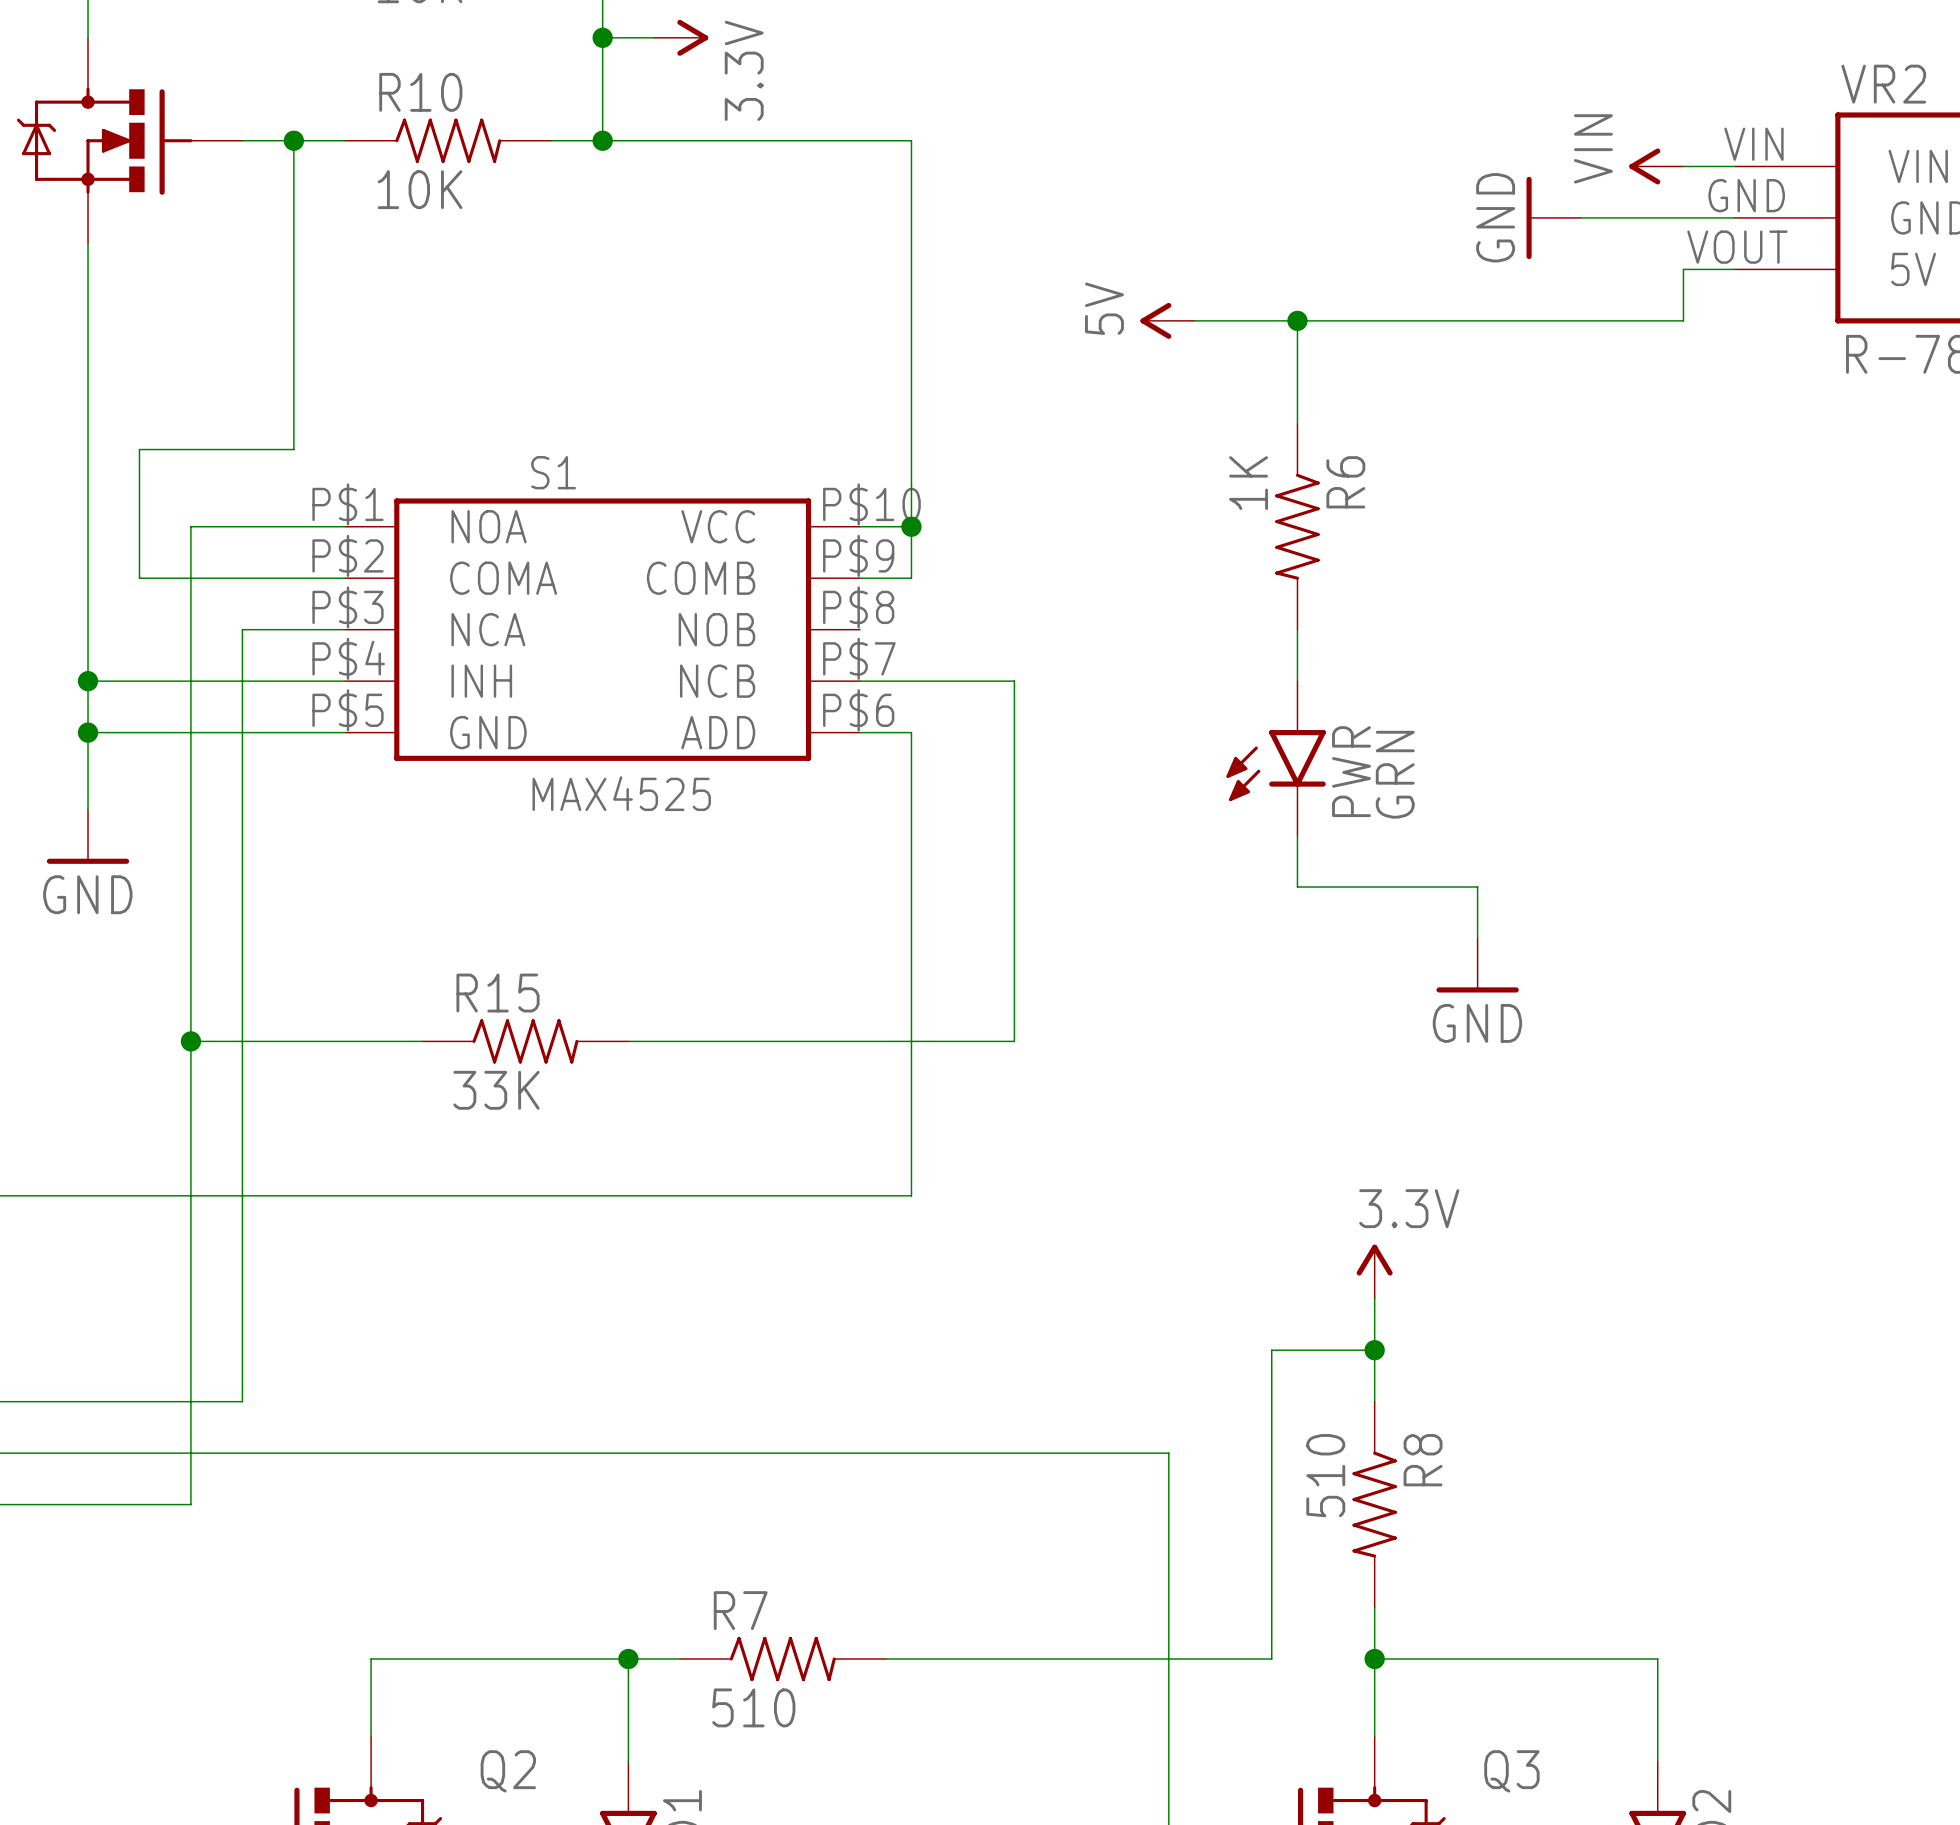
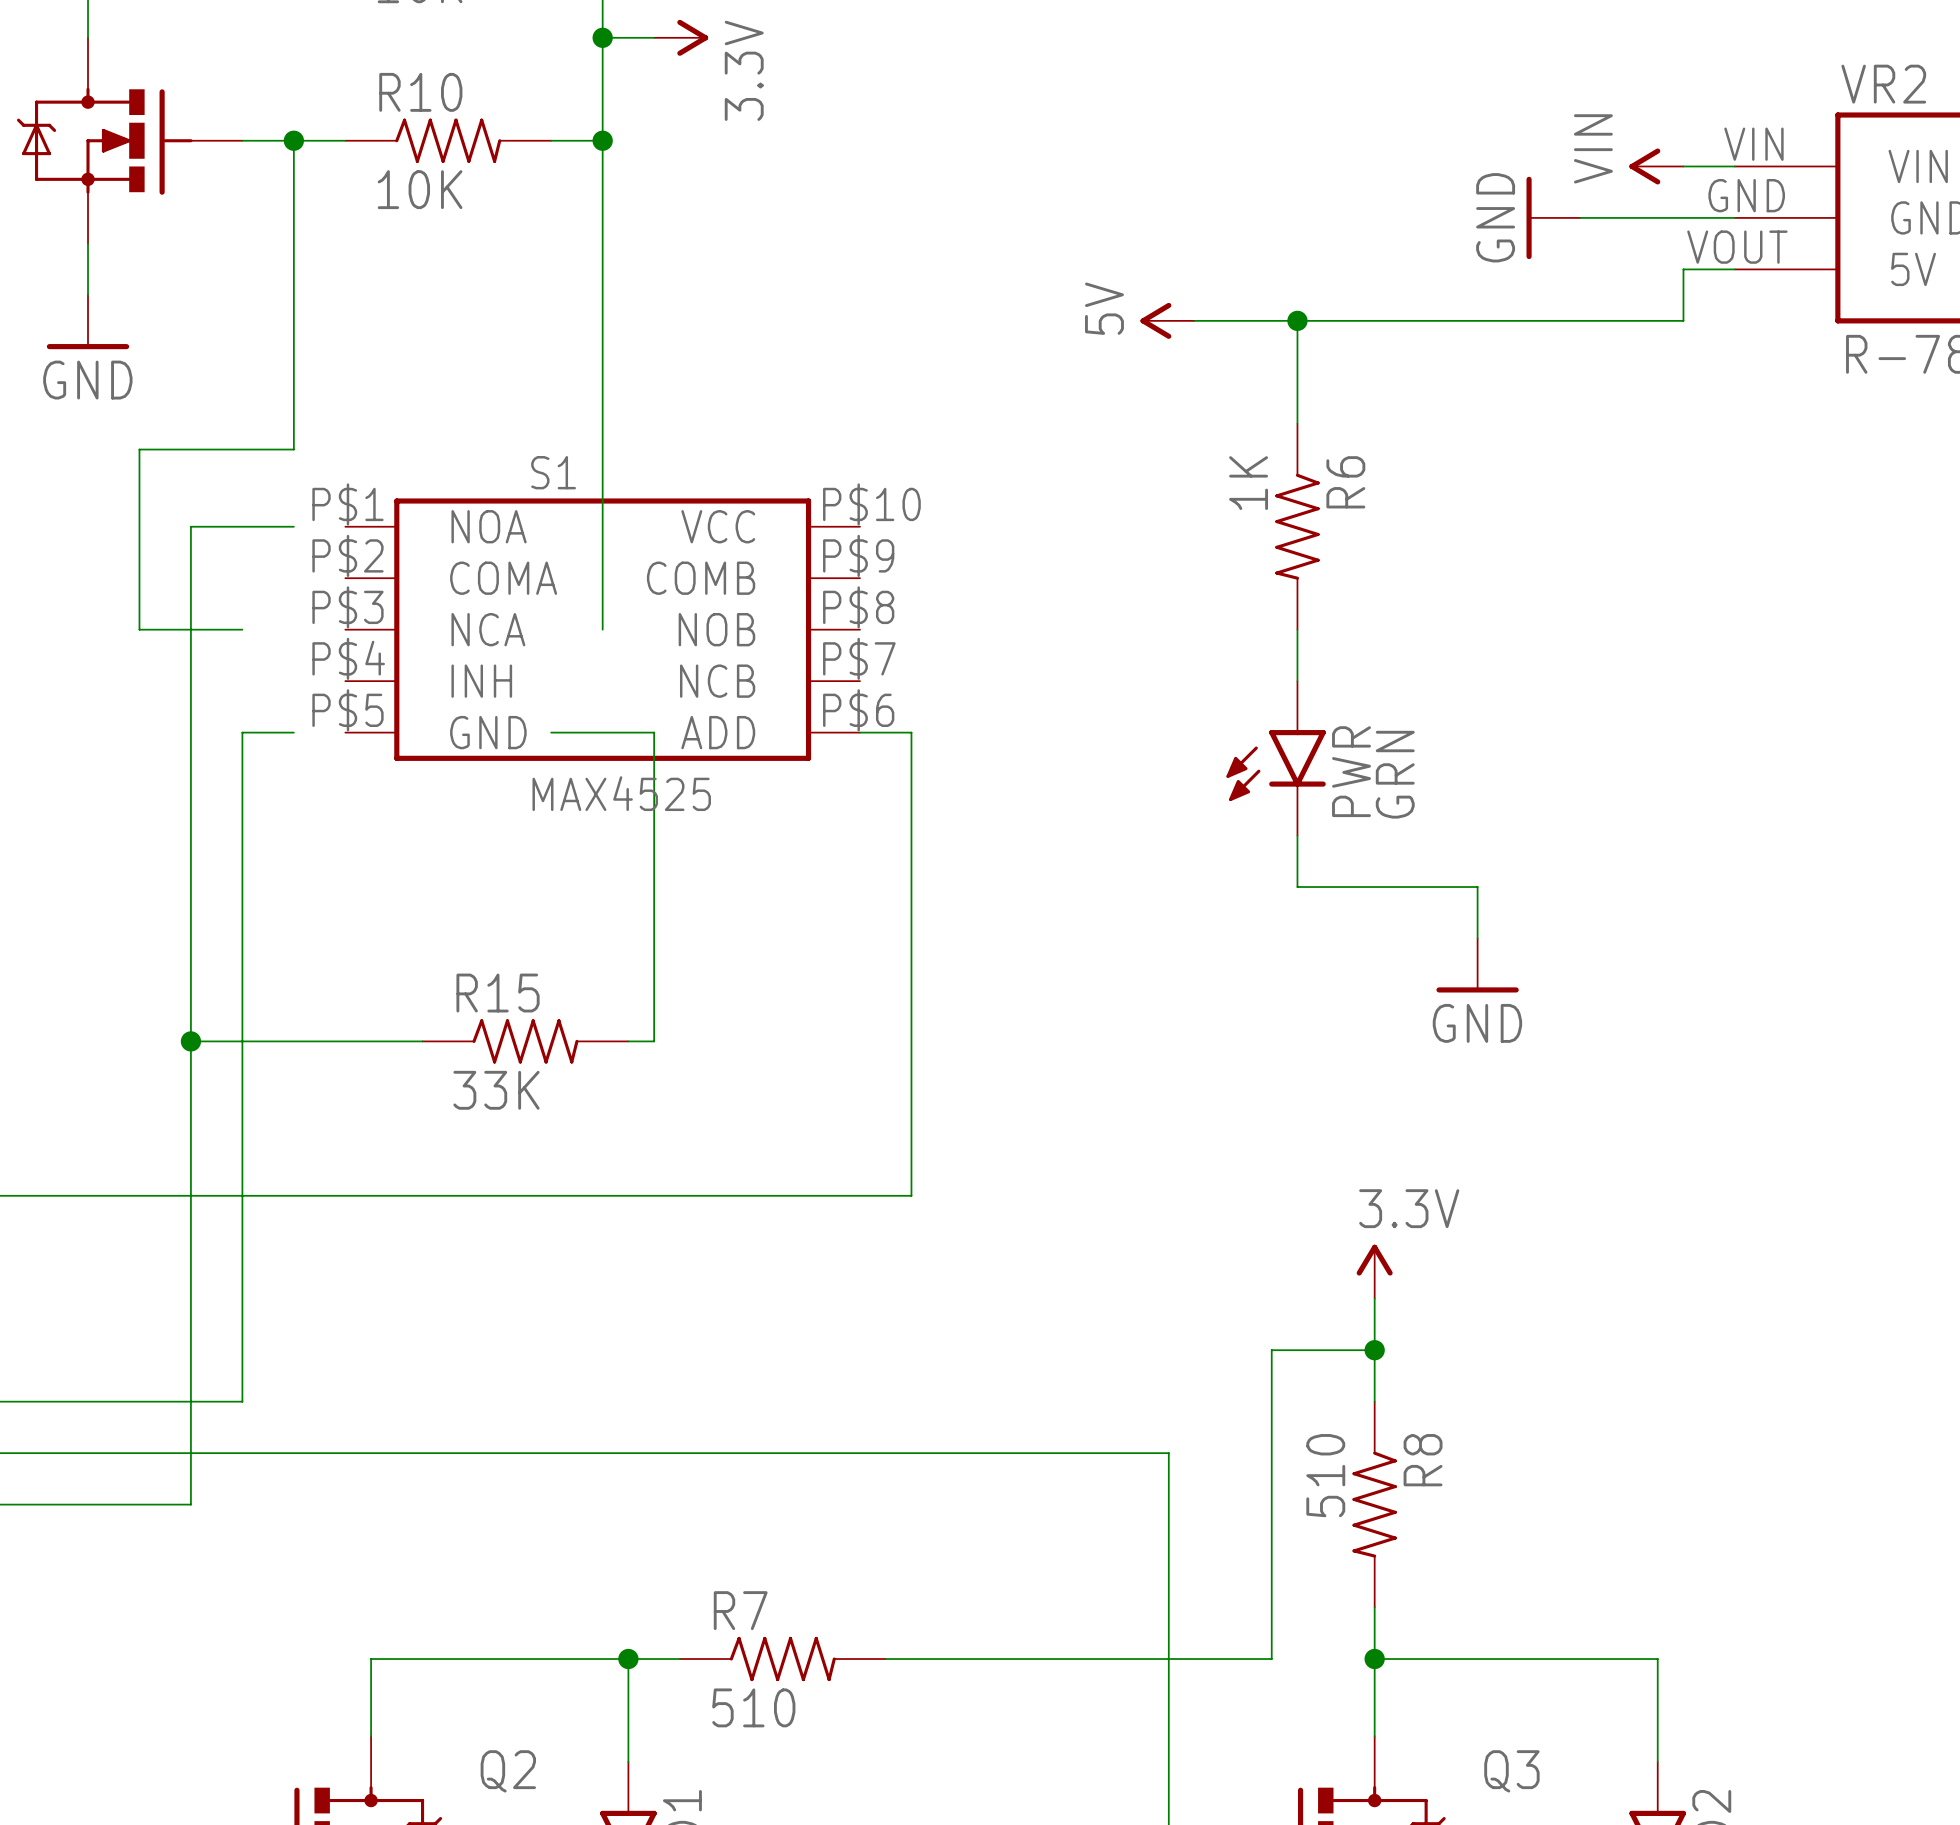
wire: (602, 140) (911, 140) (911, 578) (860, 578) -> (602, 140) (602, 629)
wire: (88, 295) (88, 809) -> none
power symbol: none -> GND (88, 322)
wire: (293, 526) (345, 526) -> none
wire: (860, 526) (911, 526) -> none
junction: (911, 526) -> none
wire: (139, 578) (345, 578) -> (139, 578) (139, 629) (242, 629)
wire: (345, 629) (242, 629) (242, 732) (88, 732) -> none
wire: (88, 681) (345, 681) -> none
junction: (88, 681) -> none
wire: (860, 681) (1014, 681) (1014, 1041) (654, 1041) -> (551, 732) (654, 732) (654, 1041)
junction: (88, 732) -> none
wire: (293, 732) (345, 732) -> none
power symbol: GND (88, 836) -> none

